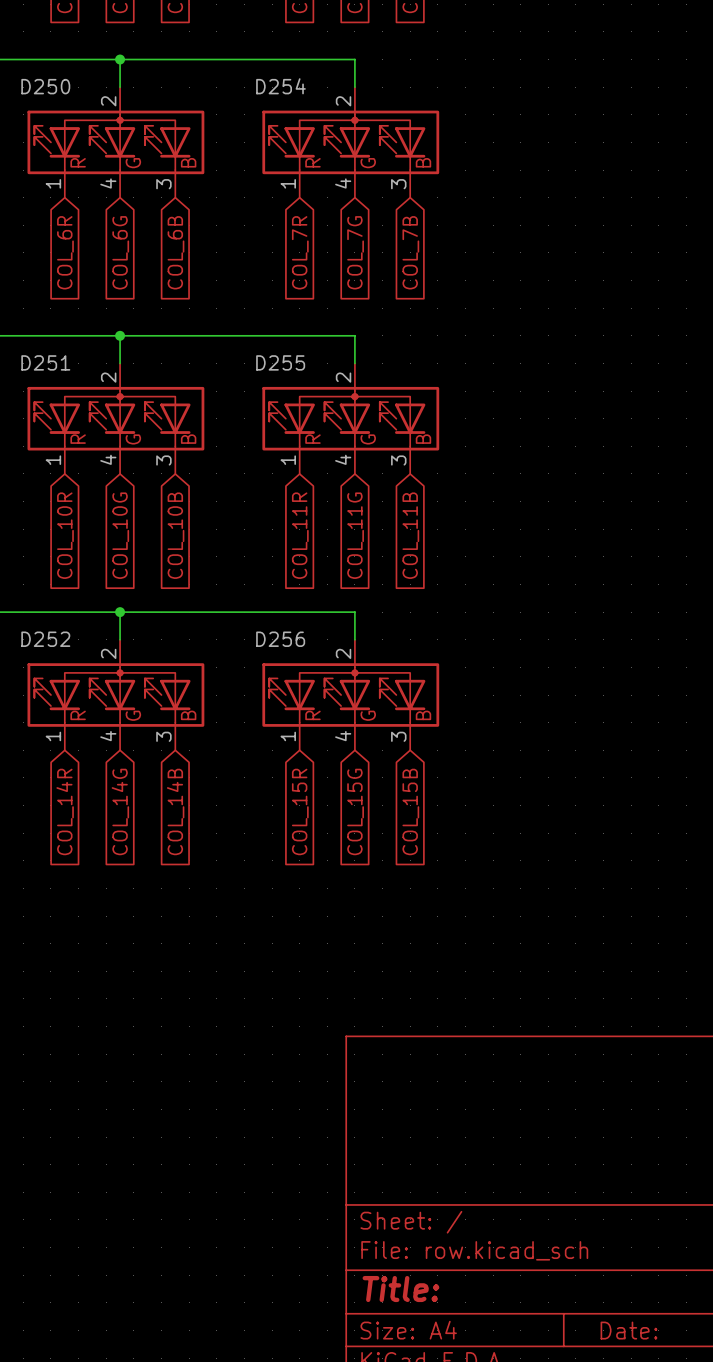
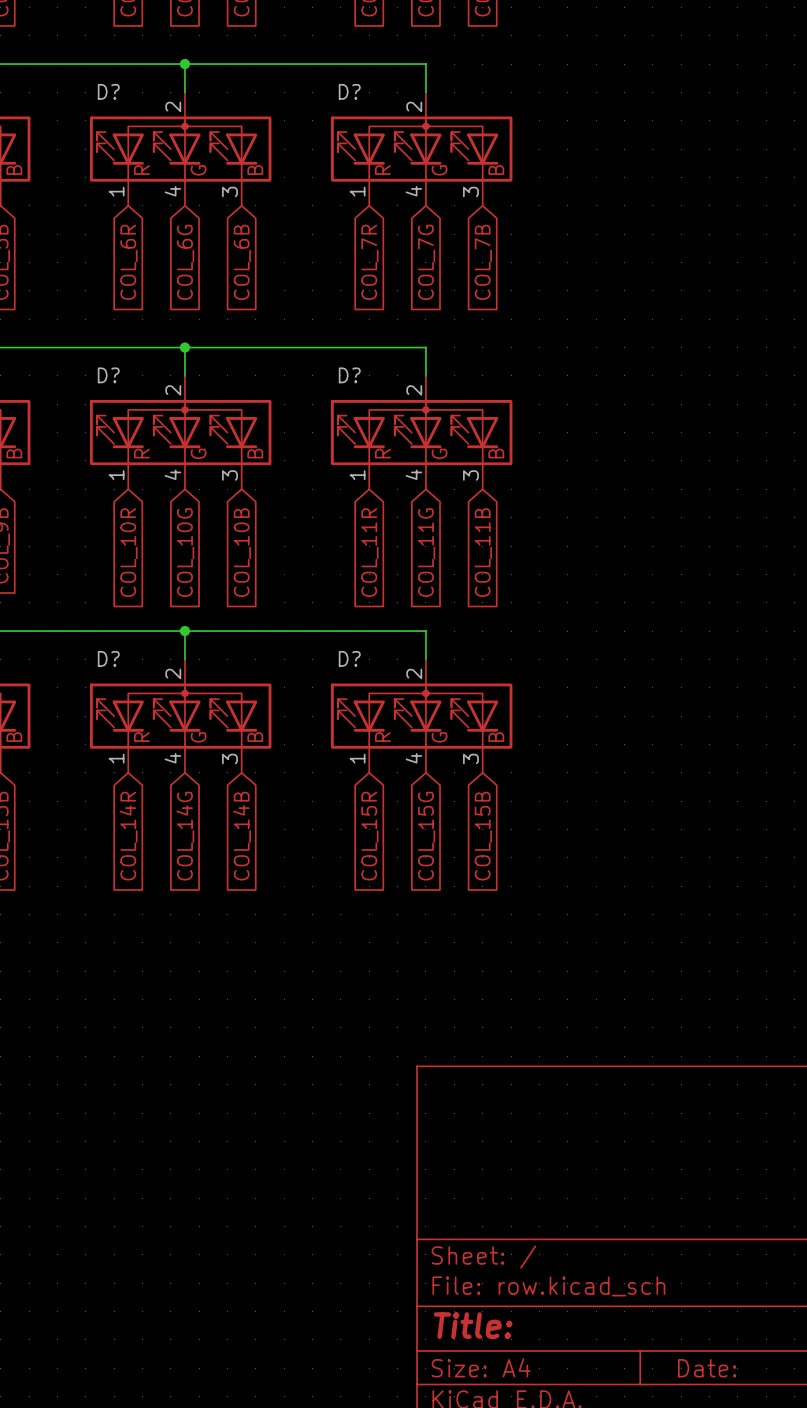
D250 name: D250 (45, 86) -> D? (108, 91)
D254 name: D254 (280, 86) -> D? (349, 91)
D251 name: D251 (45, 362) -> D? (108, 375)
D255 name: D255 (280, 362) -> D? (349, 375)
D252 name: D252 (45, 639) -> D? (108, 658)
D256 name: D256 (280, 639) -> D? (349, 658)

